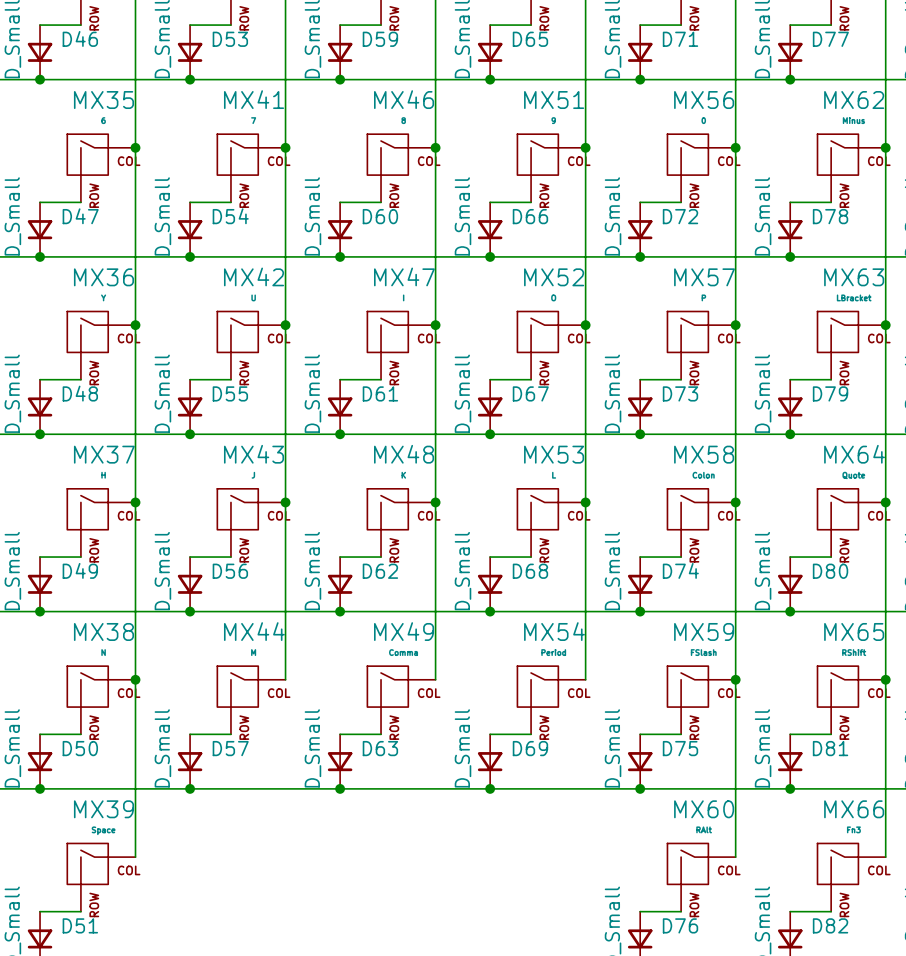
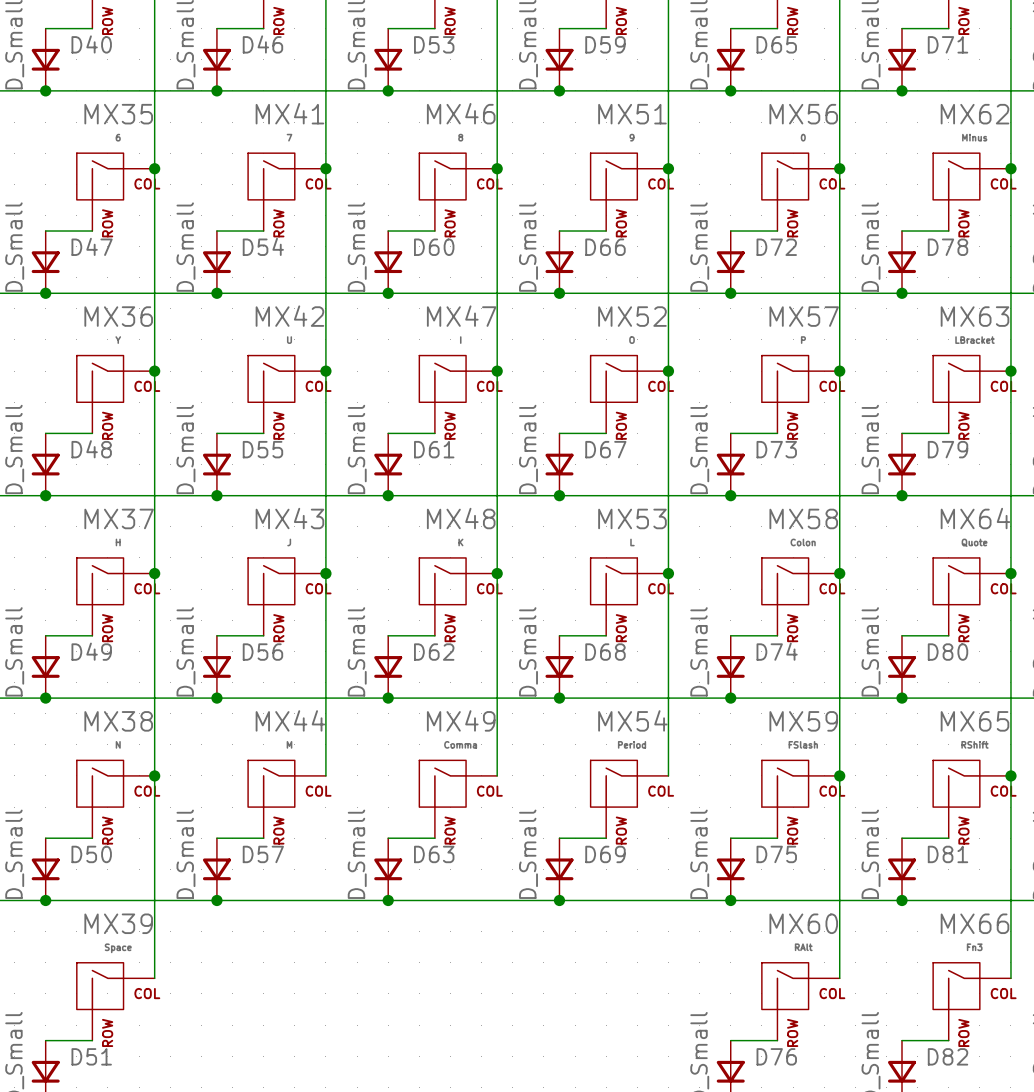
D46 name: D46 (80, 38) -> D40 (91, 44)
D53 name: D53 (230, 39) -> D46 (262, 44)
D59 name: D59 (380, 39) -> D53 (434, 44)
D65 name: D65 (530, 39) -> D59 (605, 44)
D71 name: D71 (680, 39) -> D65 (776, 44)
D77 name: D77 (830, 39) -> D71 (948, 44)

